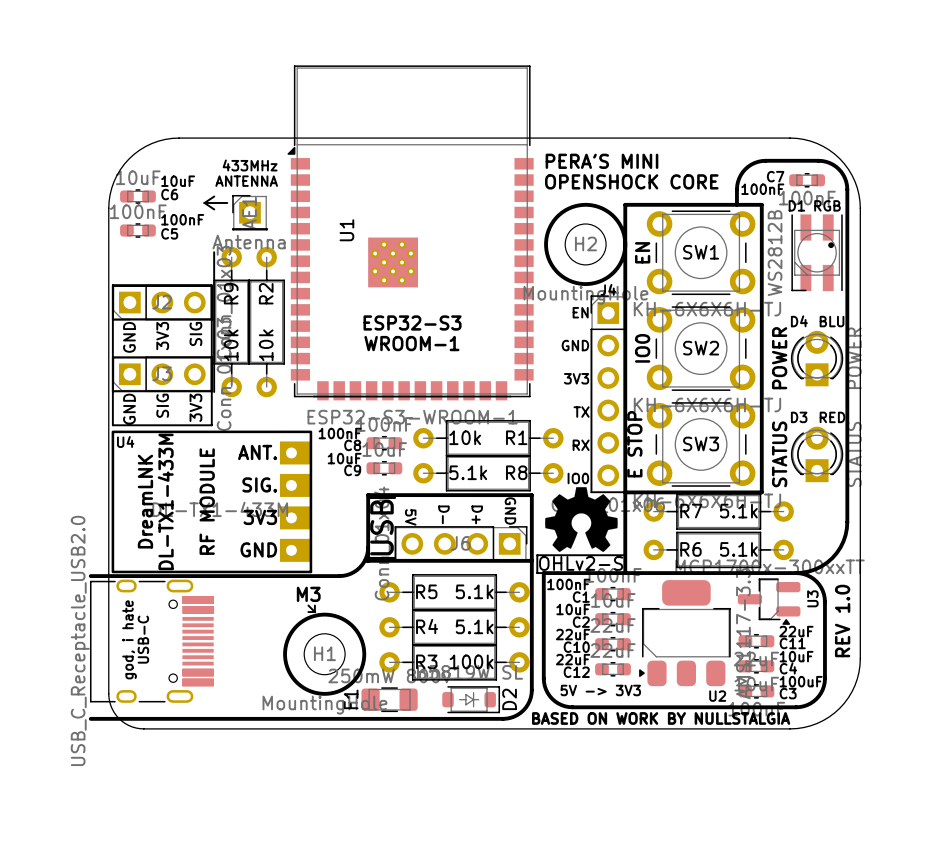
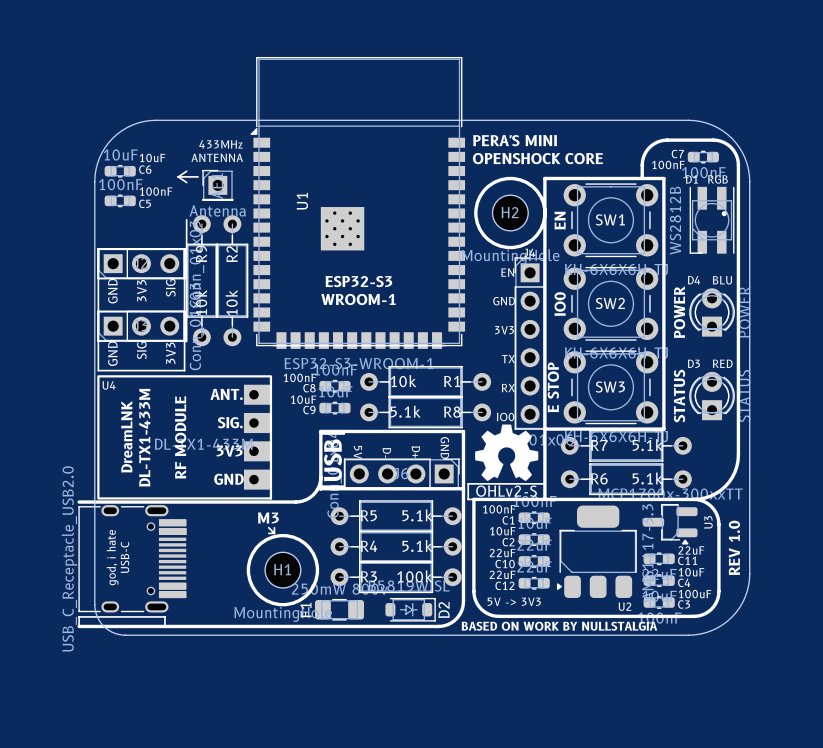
line: none -> (79, 616) (164, 616) (164, 626) (79, 626) (79, 616)

